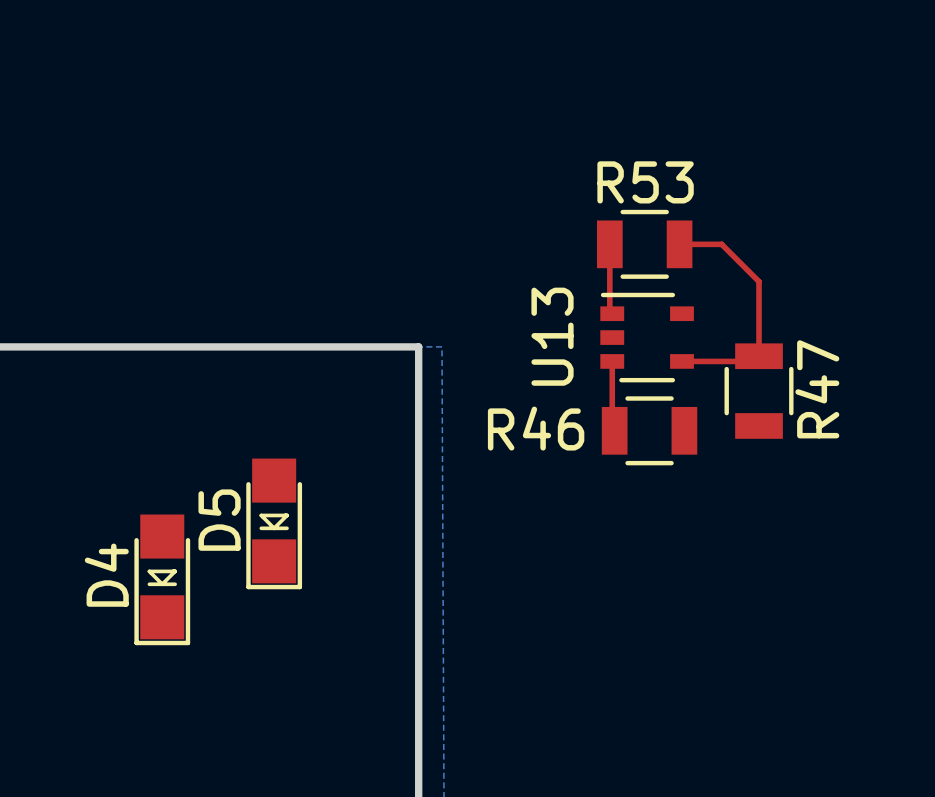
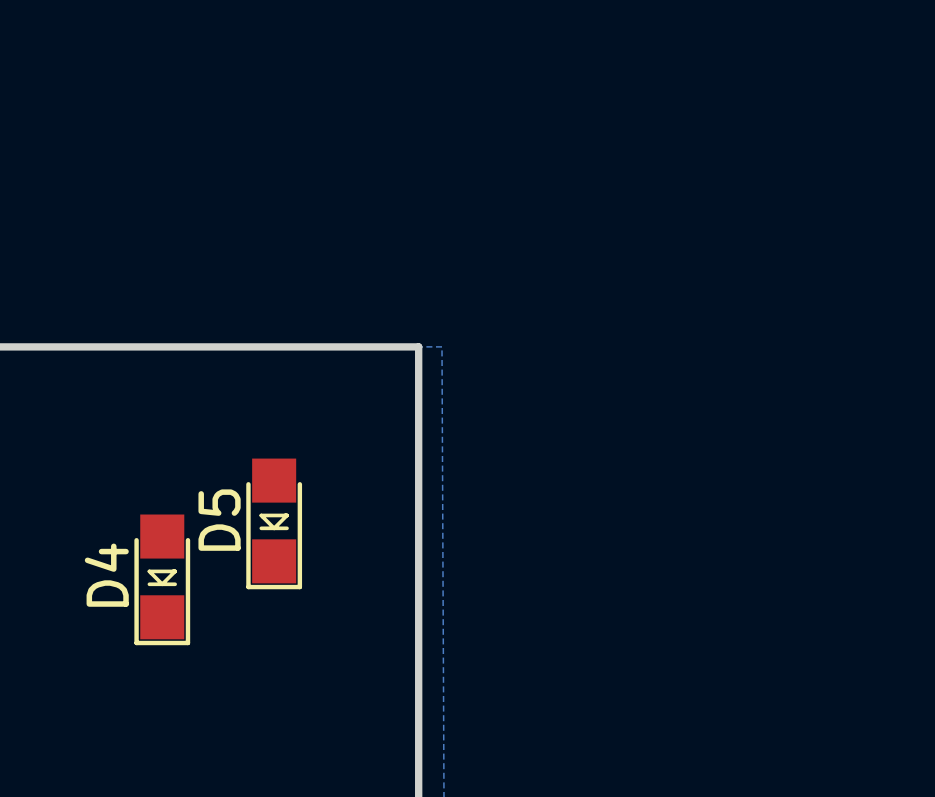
top track: (609, 244) (609, 311) (612, 313) -> none
R53: (644, 244) -> none
top track: (679, 244) (721, 244) (759, 281) (759, 356) (753, 361) (681, 361) -> none
U13: (647, 337) -> none
top track: (612, 361) (612, 428) (614, 430) -> none
R47: (759, 391) -> none
R46: (649, 430) -> none

